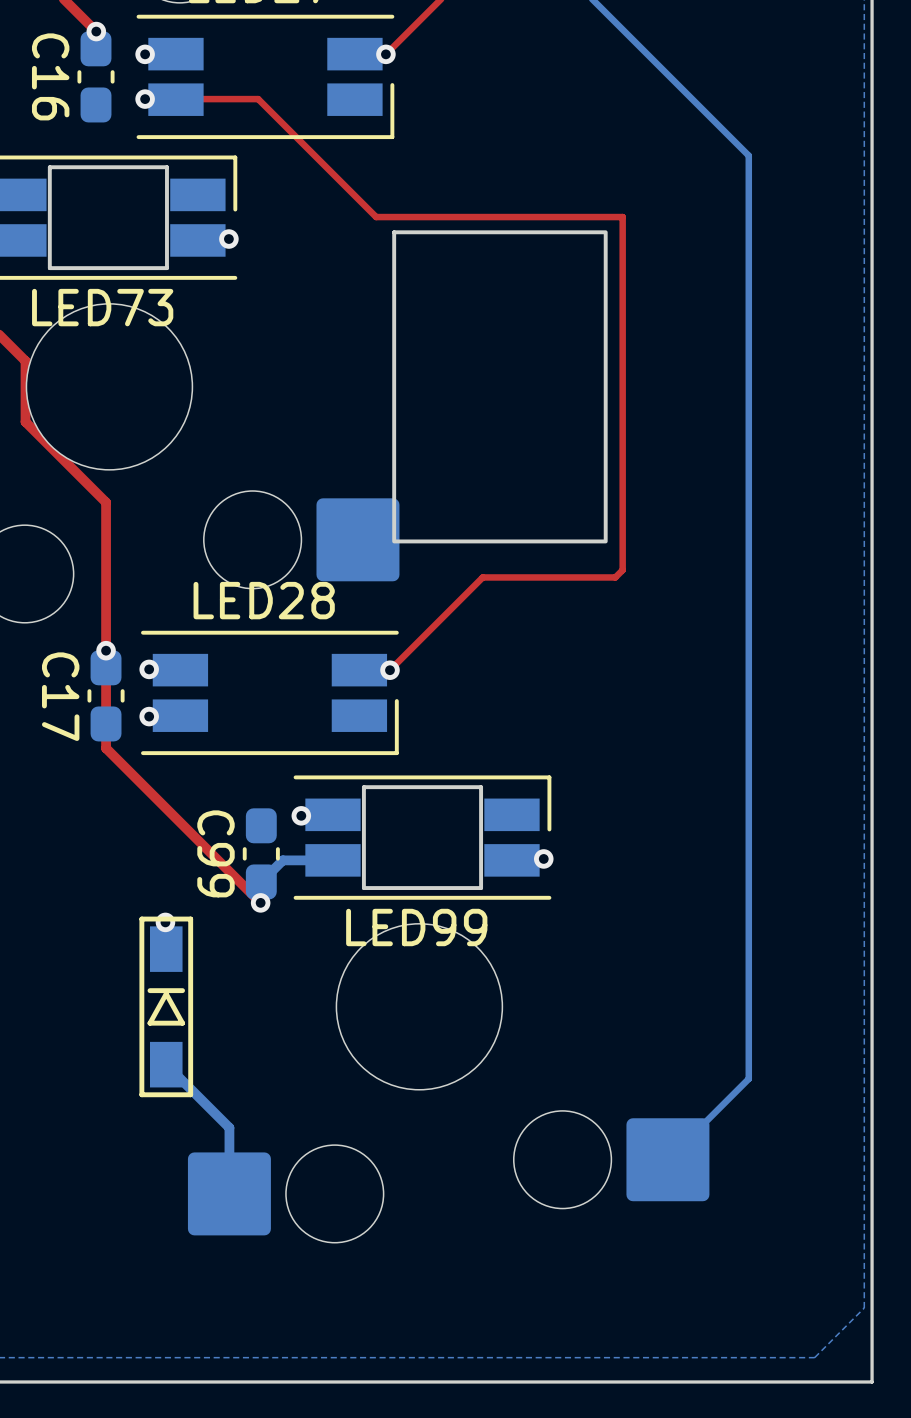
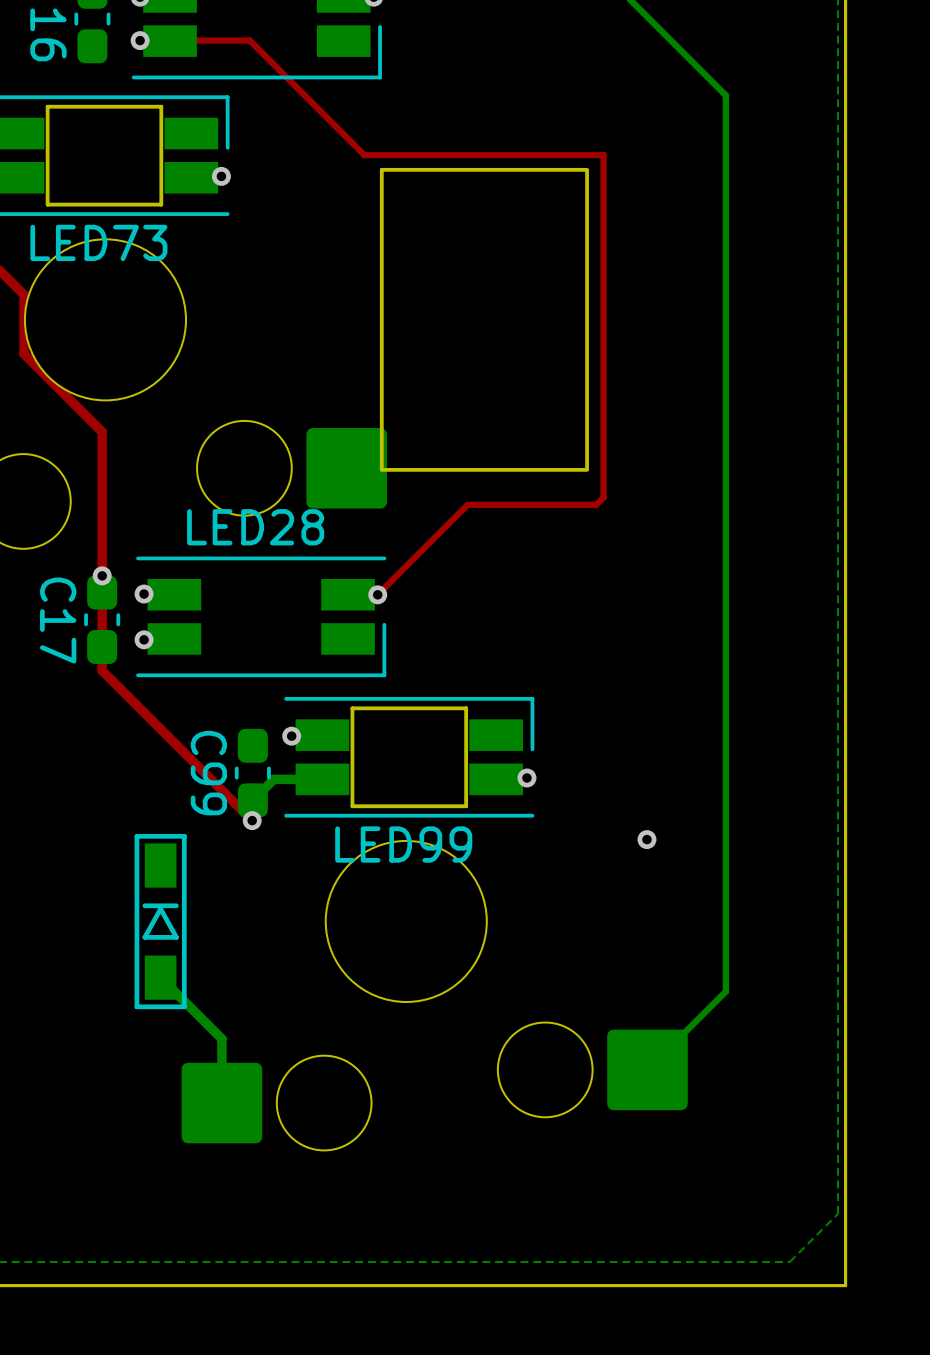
via: (165, 922) -> none
via: none -> (646, 839)

